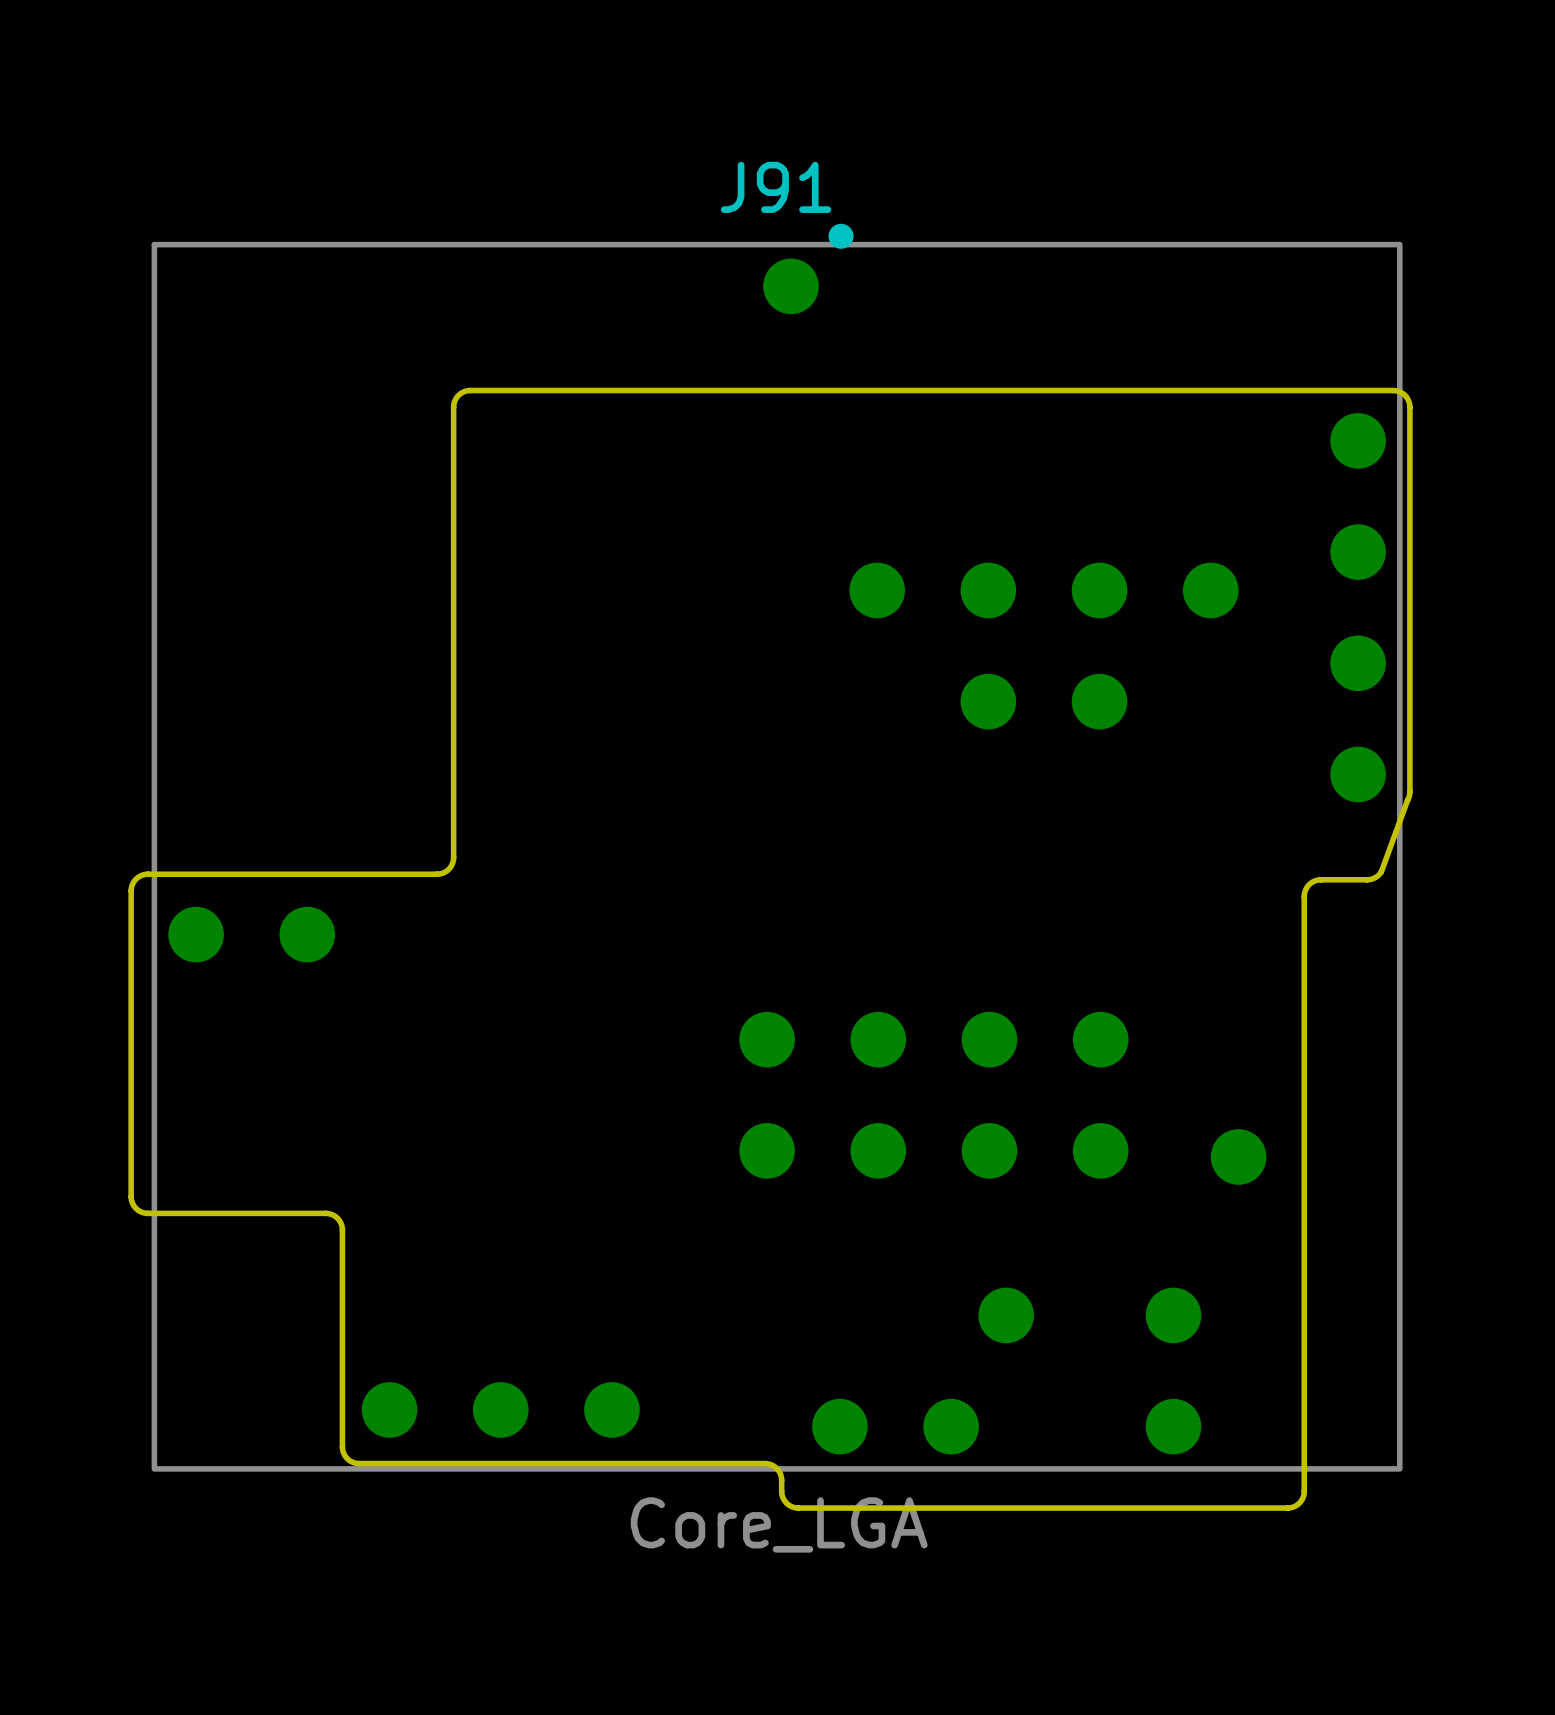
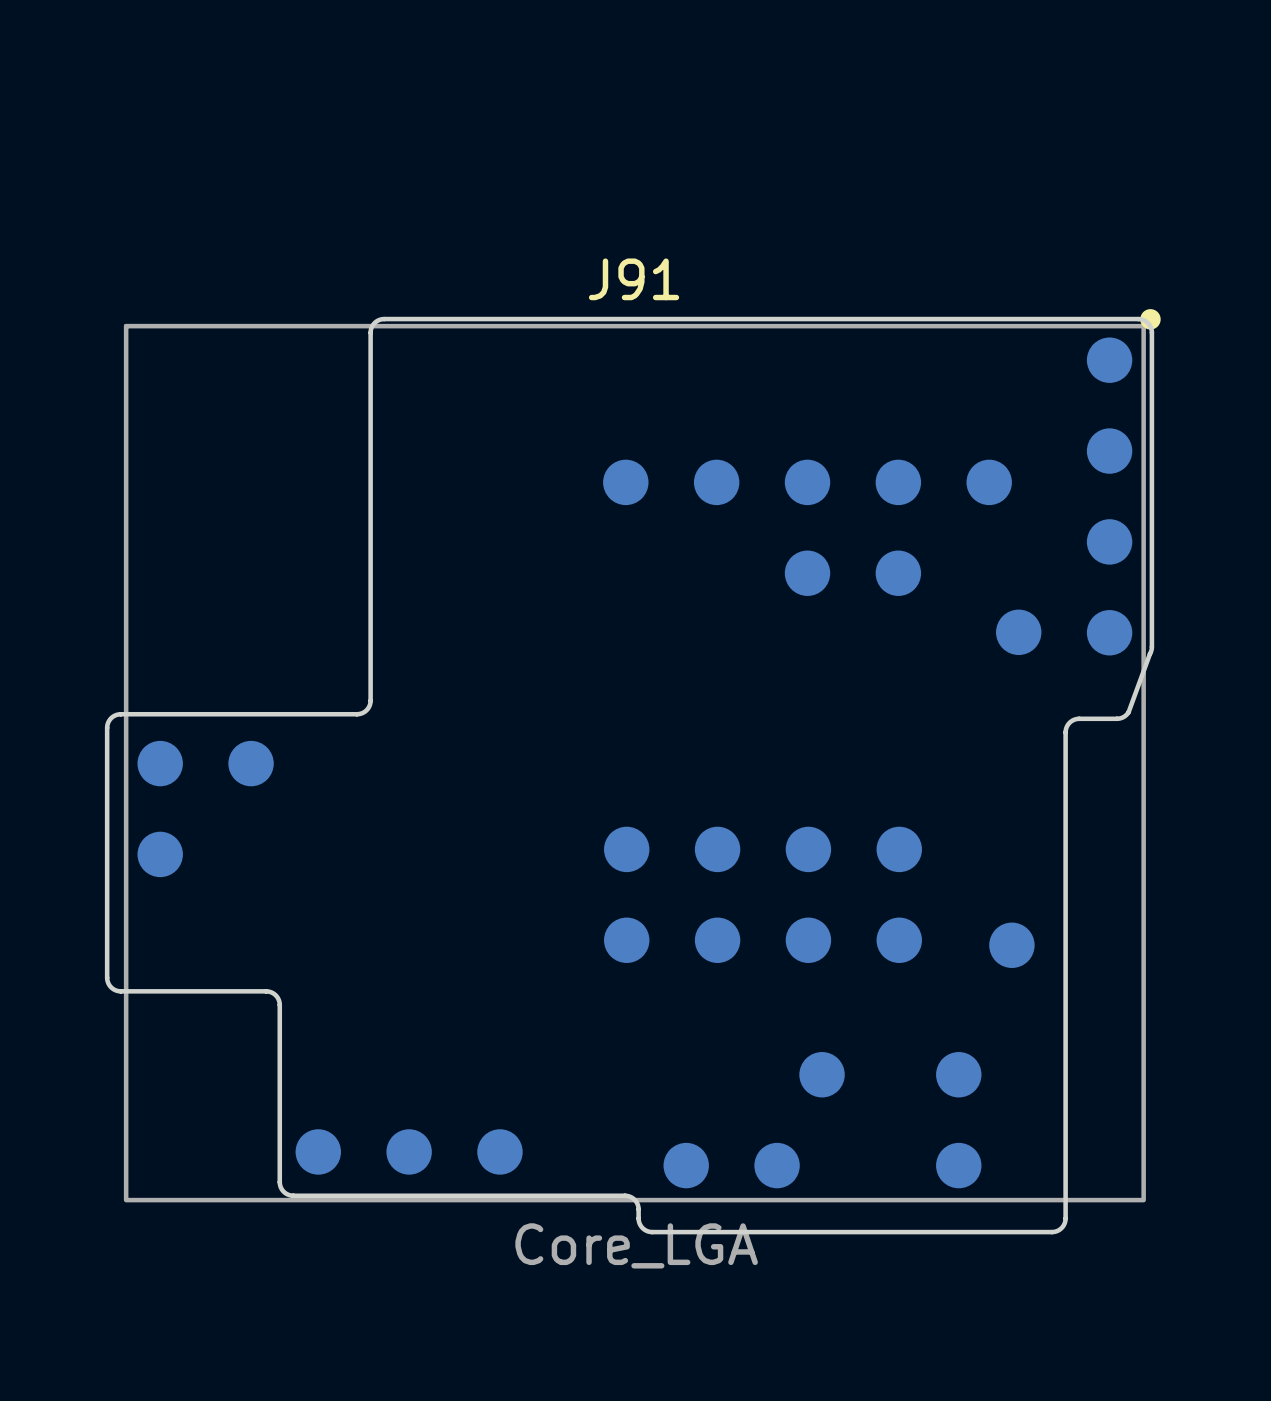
J91 footprint: [151, 223, 1403, 1472] -> [123, 309, 1161, 1203]

